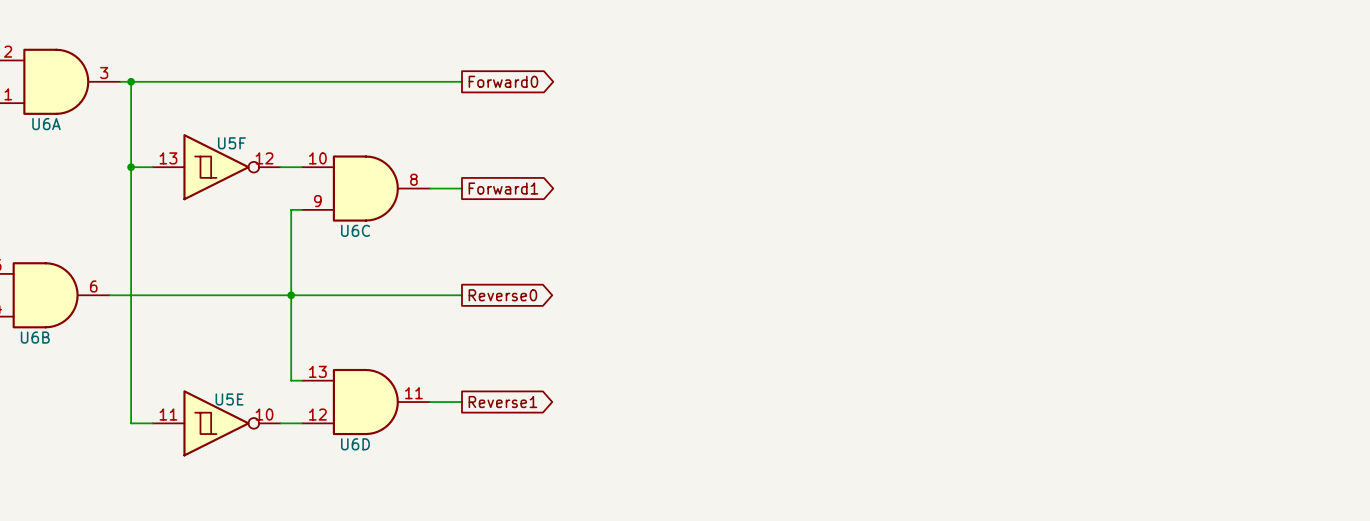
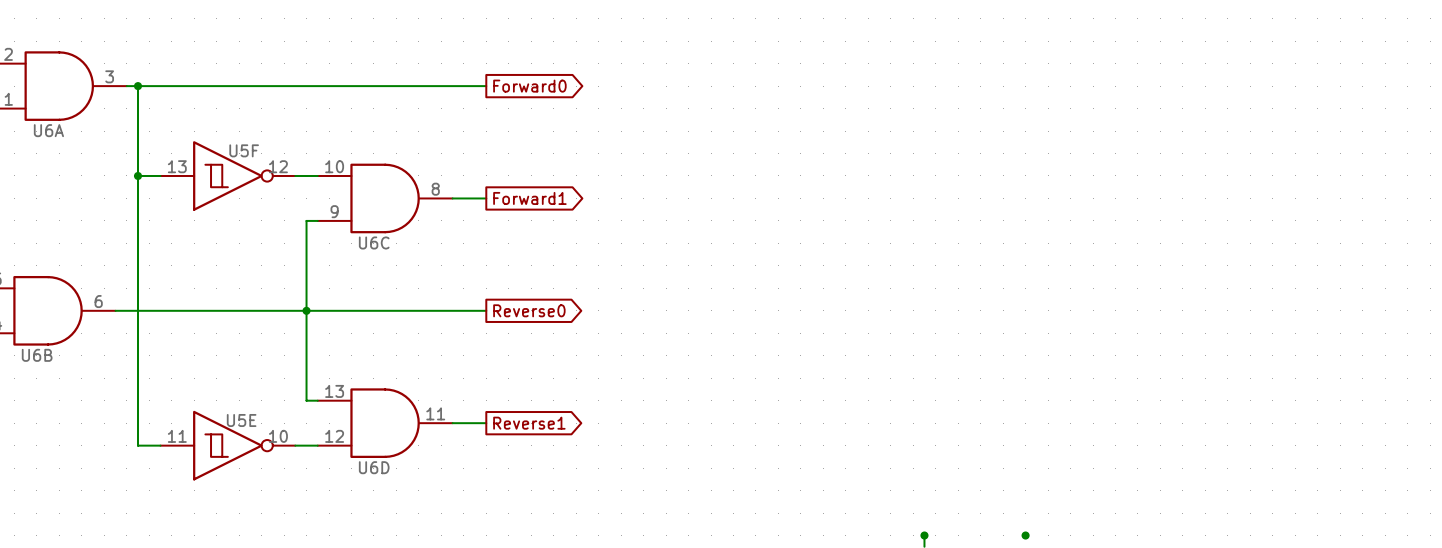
wire: none -> (924, 535) (924, 546)
junction: none -> (924, 535)
junction: none -> (1025, 535)

